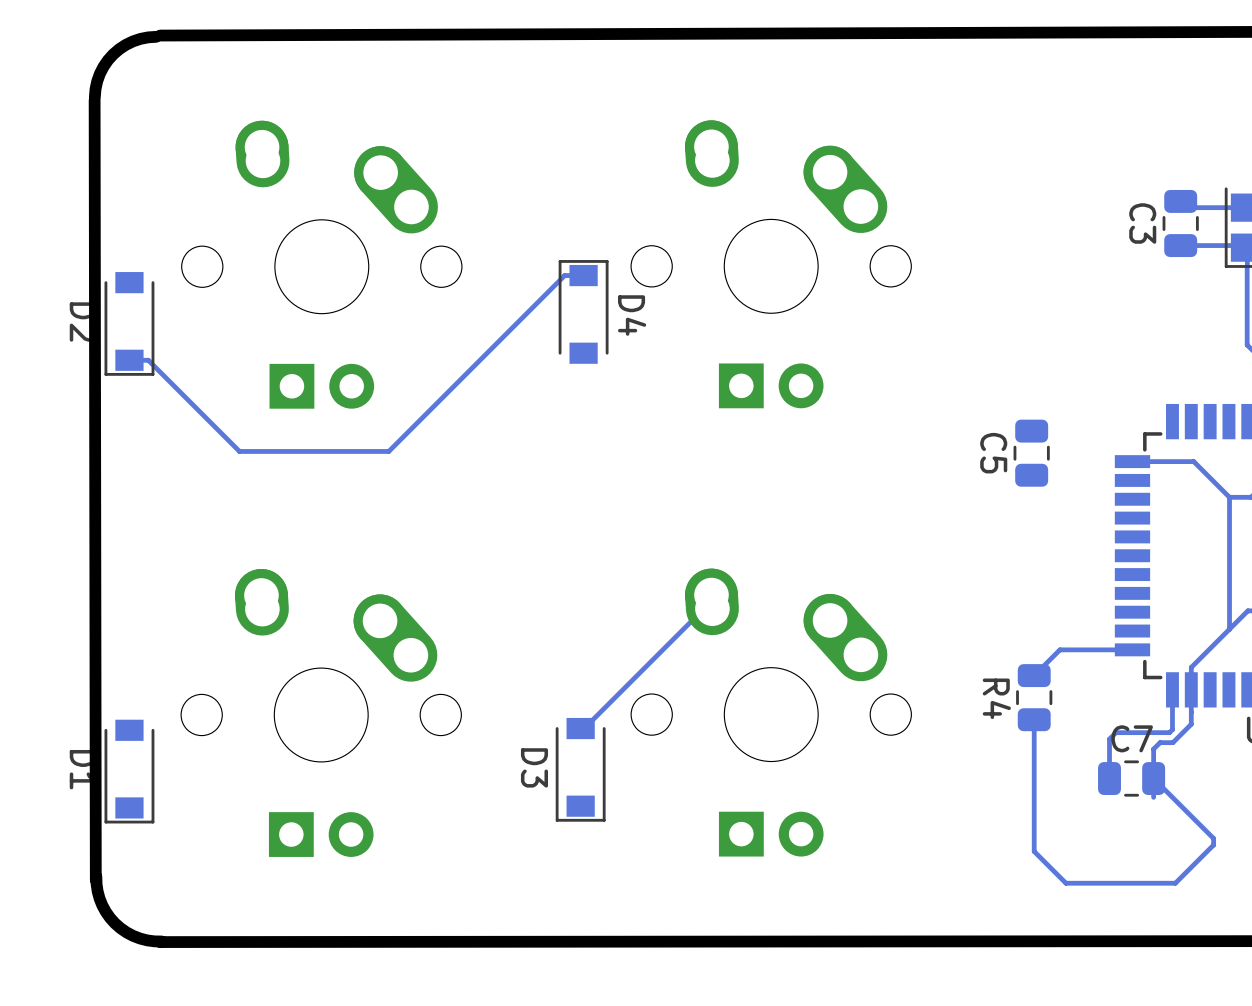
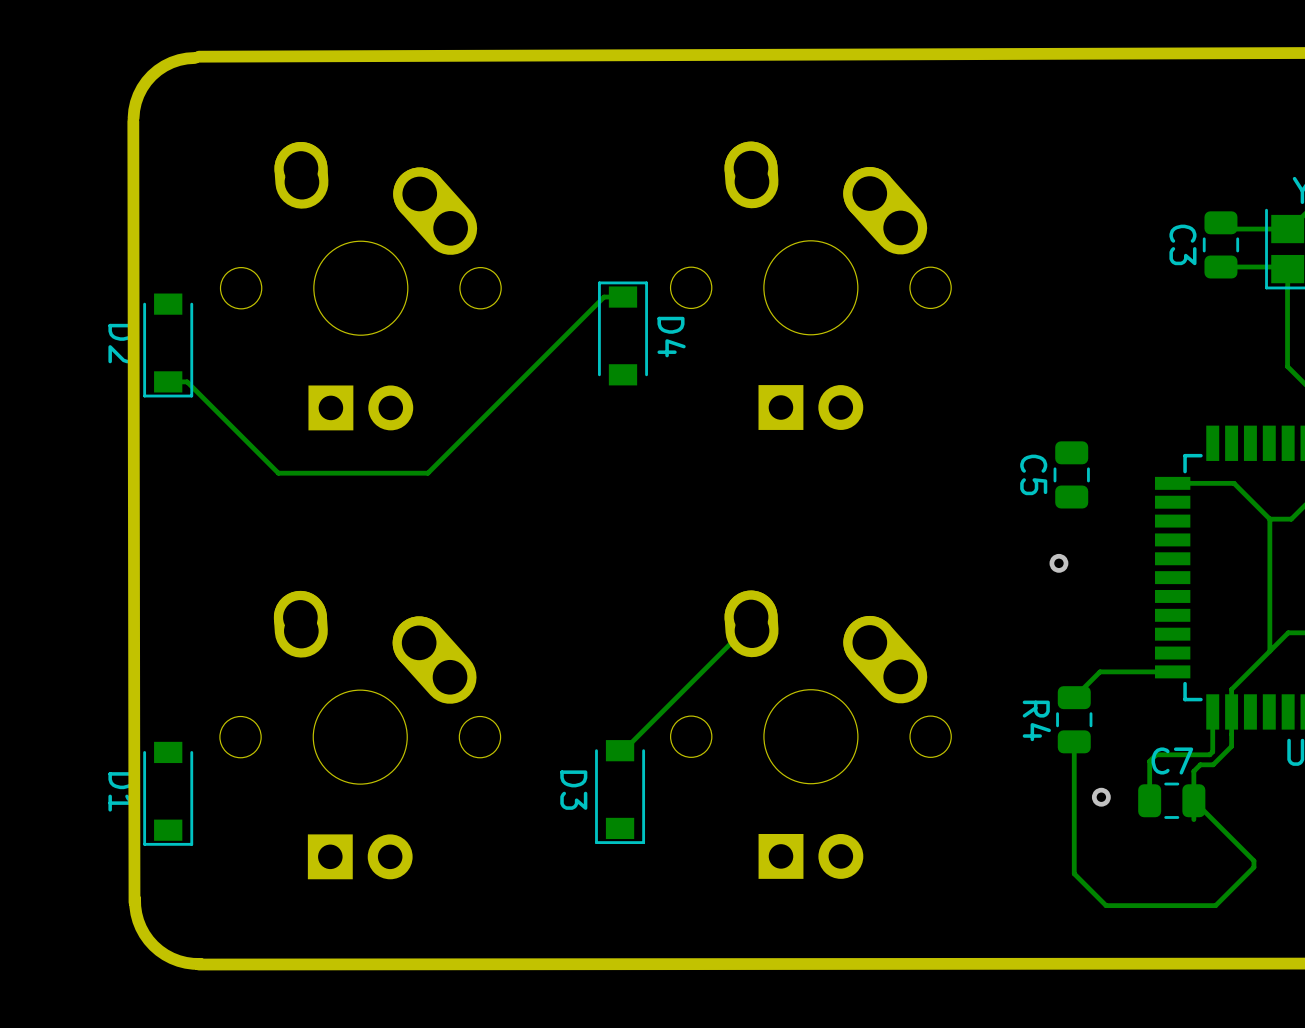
via: none -> (1058, 563)
via: none -> (1101, 797)

